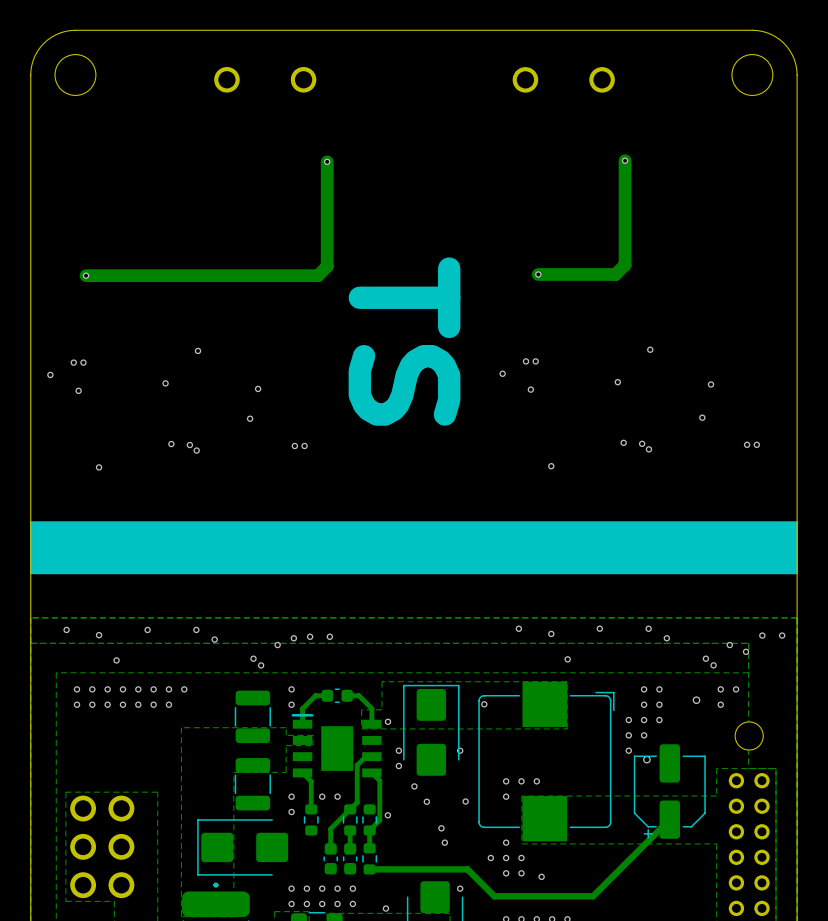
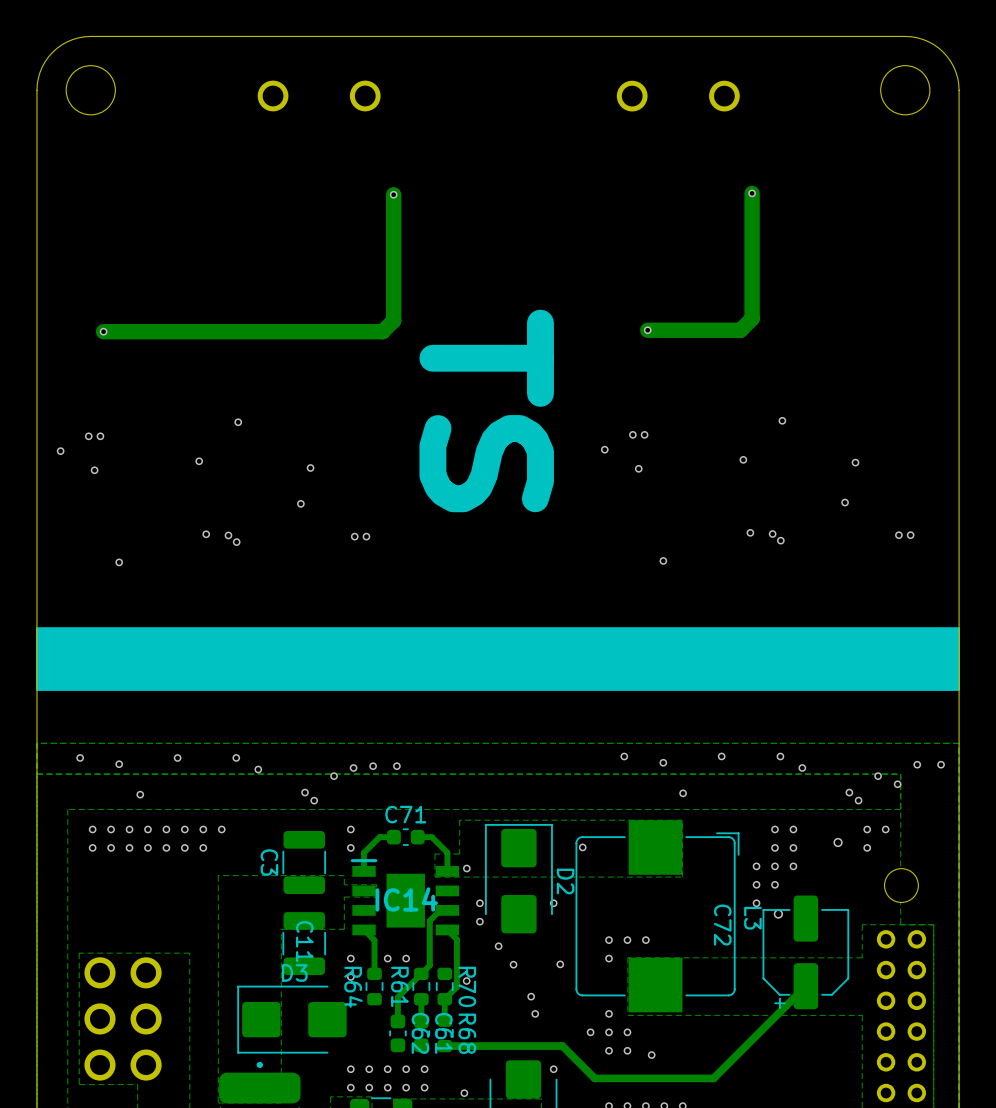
C71 name: none -> C71 (405, 814)
C3 name: none -> C3 (269, 862)
D2 name: none -> D2 (565, 881)
IC14 name: none -> IC14 (406, 899)
L3 name: none -> L3 (752, 918)
C72 name: none -> C72 (722, 925)
C11 name: none -> C11 (304, 941)
D3 name: none -> D3 (294, 972)
R64 name: none -> R64 (353, 987)
R61 name: none -> R61 (399, 986)
R70 name: none -> R70 (467, 986)
C62 name: none -> C62 (420, 1033)
C61 name: none -> C61 (443, 1033)
R68 name: none -> R68 (467, 1033)

